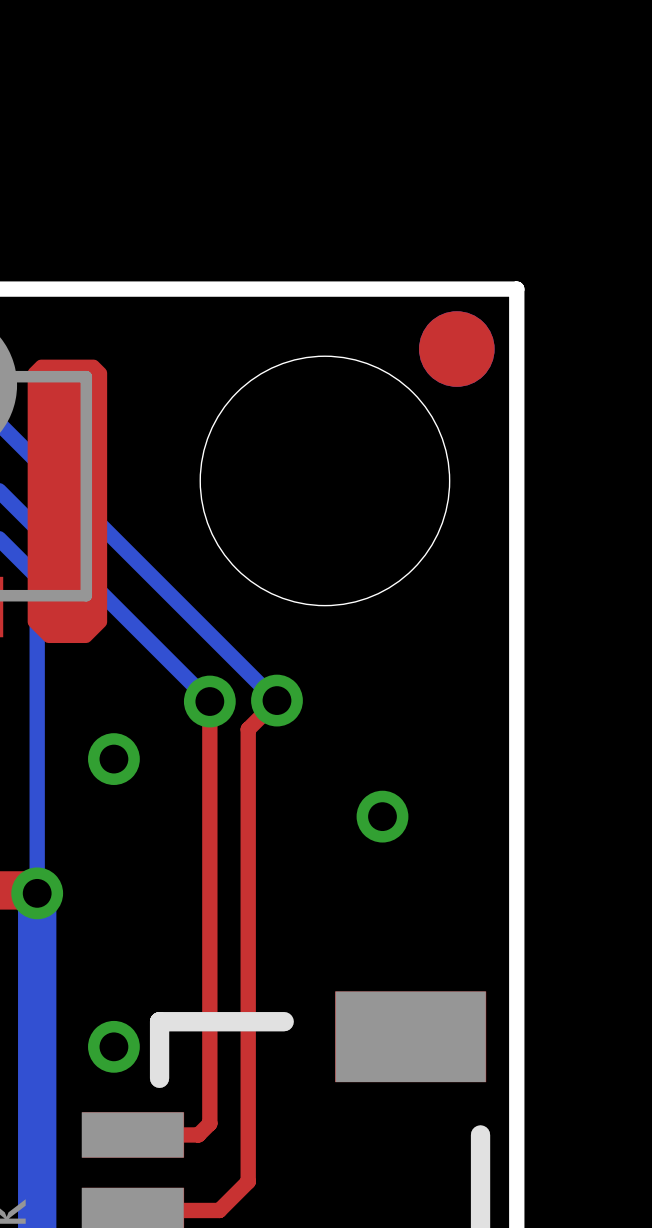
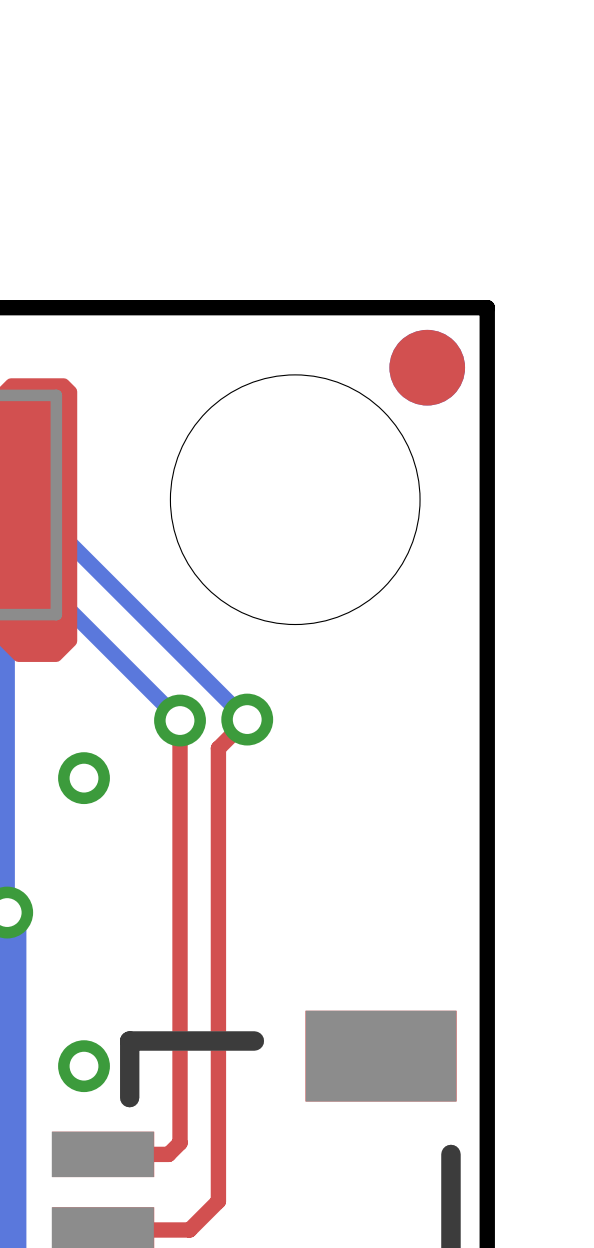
via: (382, 816) -> none

